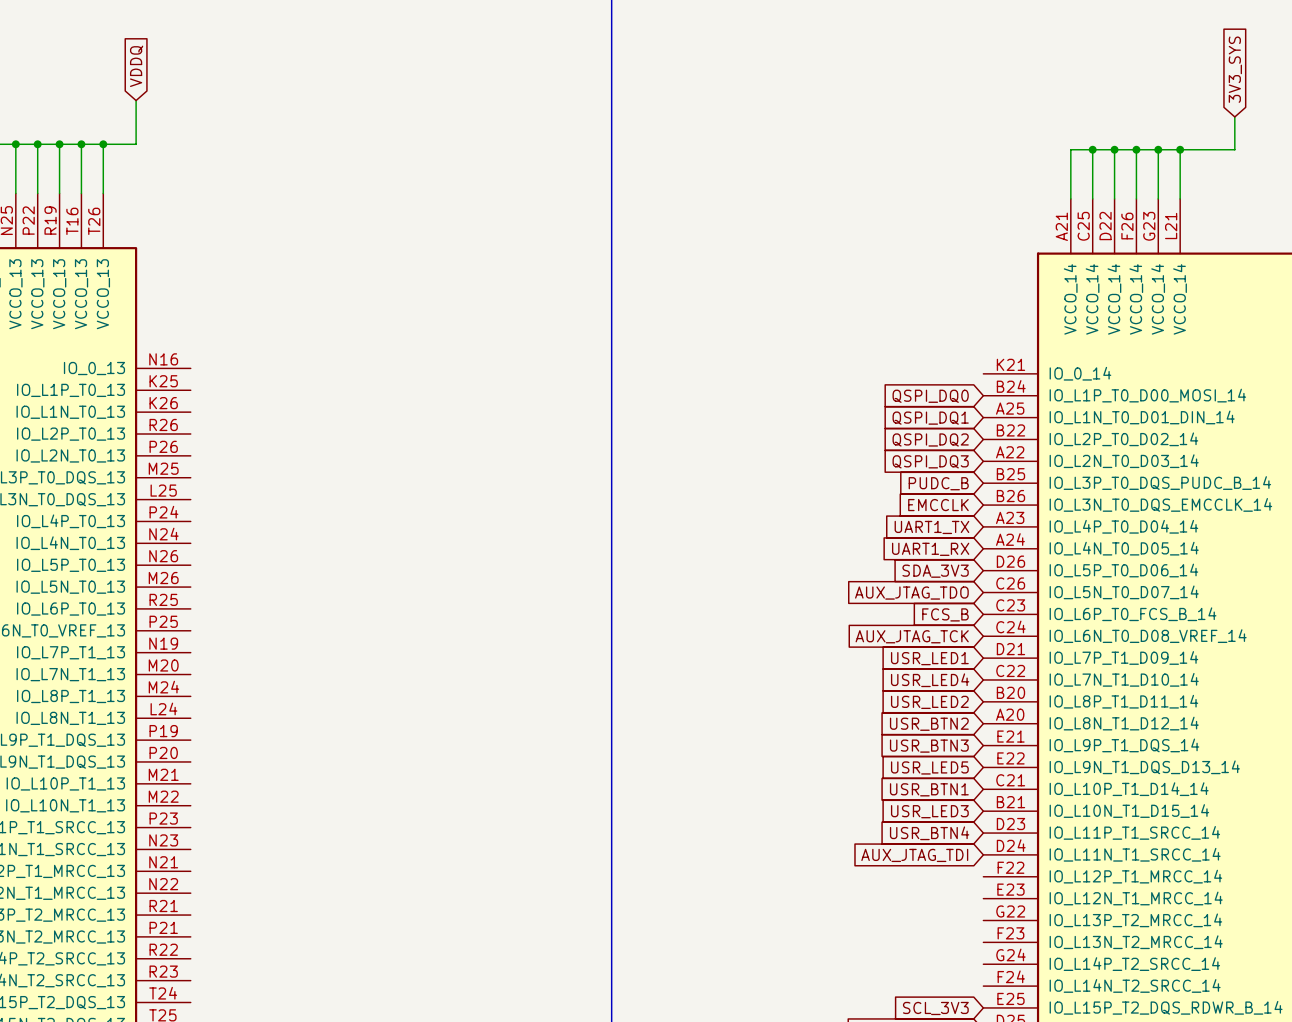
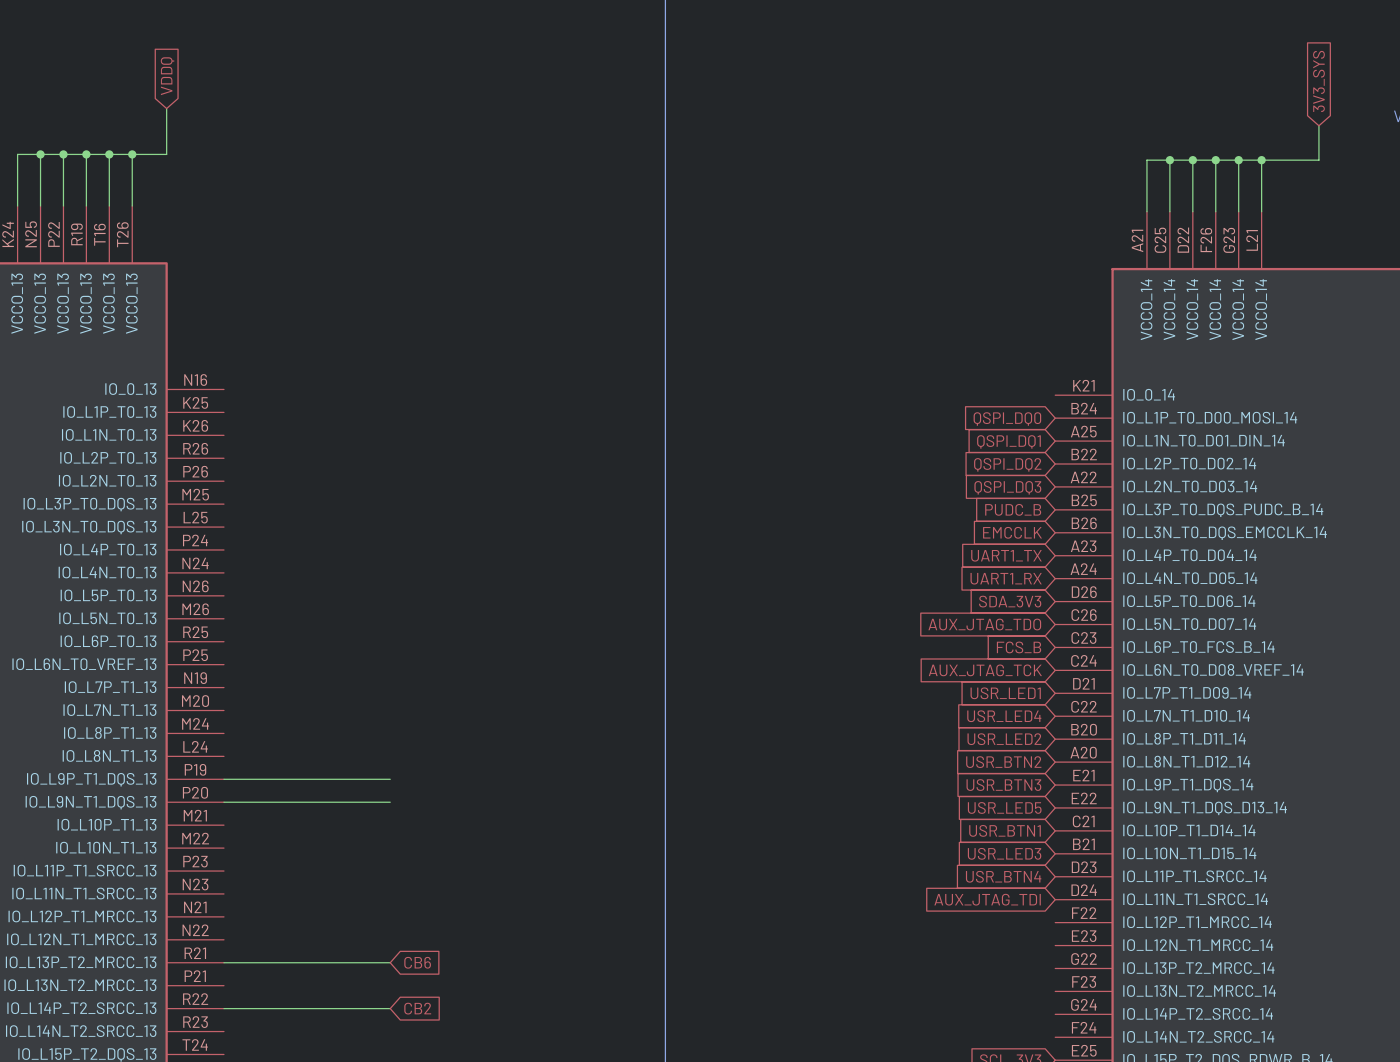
wire: none -> (223, 779) (390, 779)
wire: none -> (223, 802) (390, 802)
wire: none -> (223, 962) (390, 962)
global label: none -> CB6 (417, 962)
wire: none -> (223, 1008) (390, 1008)
global label: none -> CB2 (417, 1008)

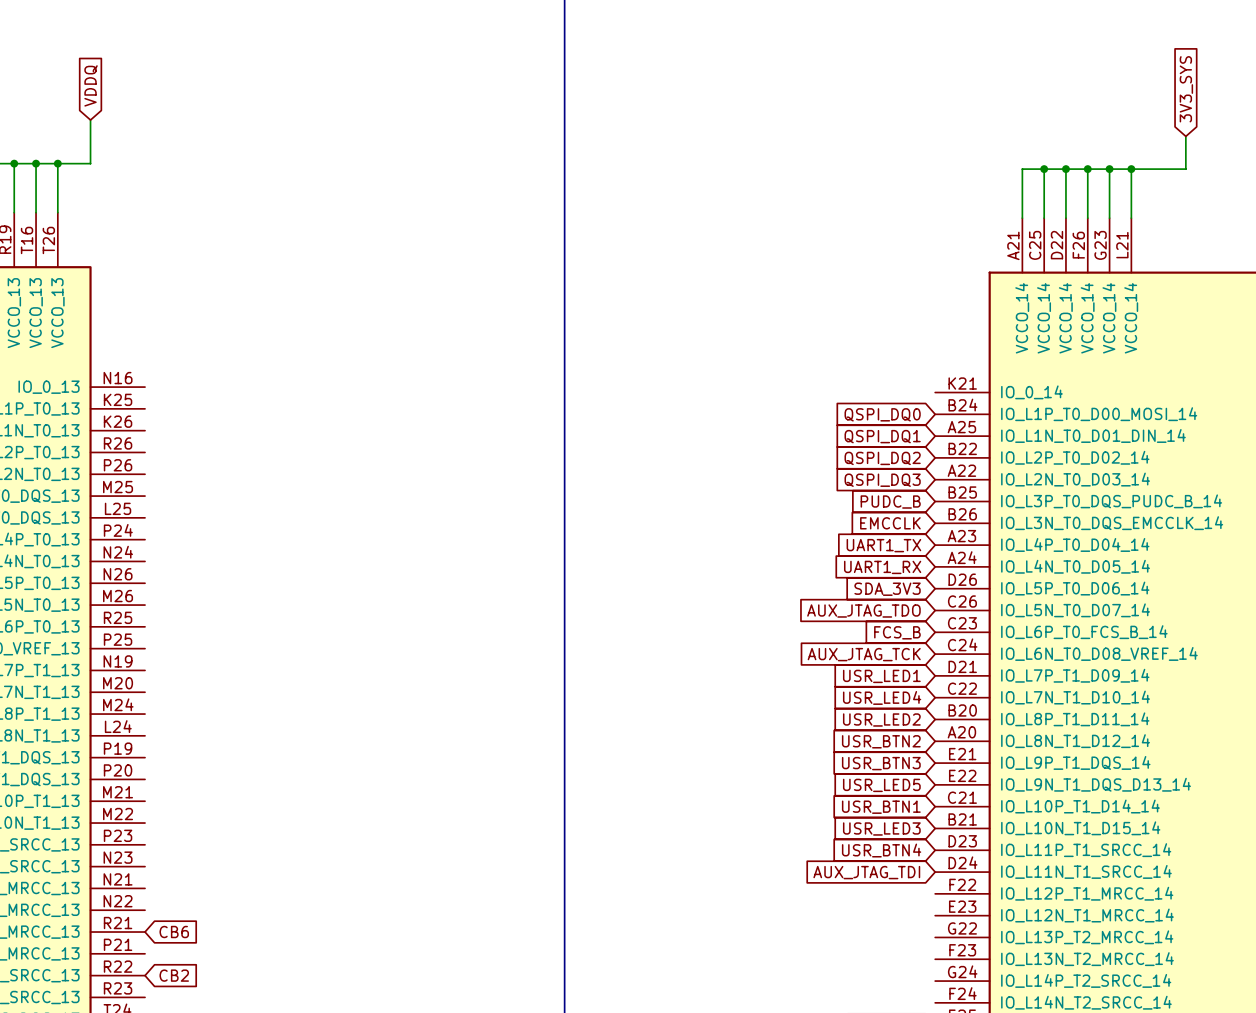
wire: (223, 779) (390, 779) -> none
wire: (223, 802) (390, 802) -> none
wire: (223, 962) (390, 962) -> none
global label position: CB6 (417, 962) -> CB6 (174, 932)
wire: (223, 1008) (390, 1008) -> none
global label position: CB2 (417, 1008) -> CB2 (174, 975)

